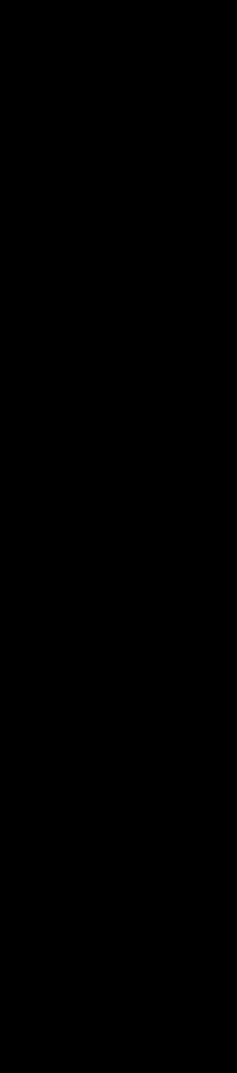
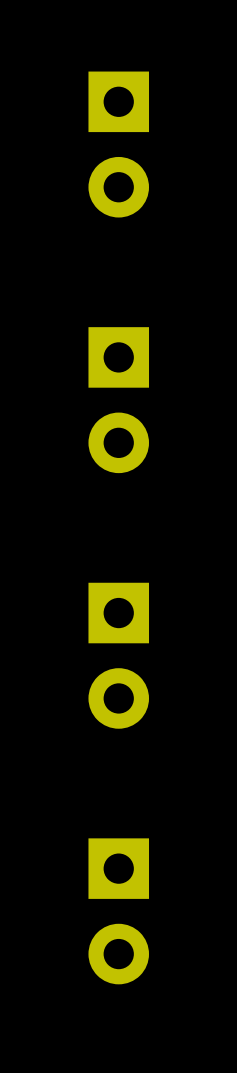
part: none -> (118, 144)
part: none -> (118, 400)
part: none -> (118, 655)
part: none -> (118, 911)

